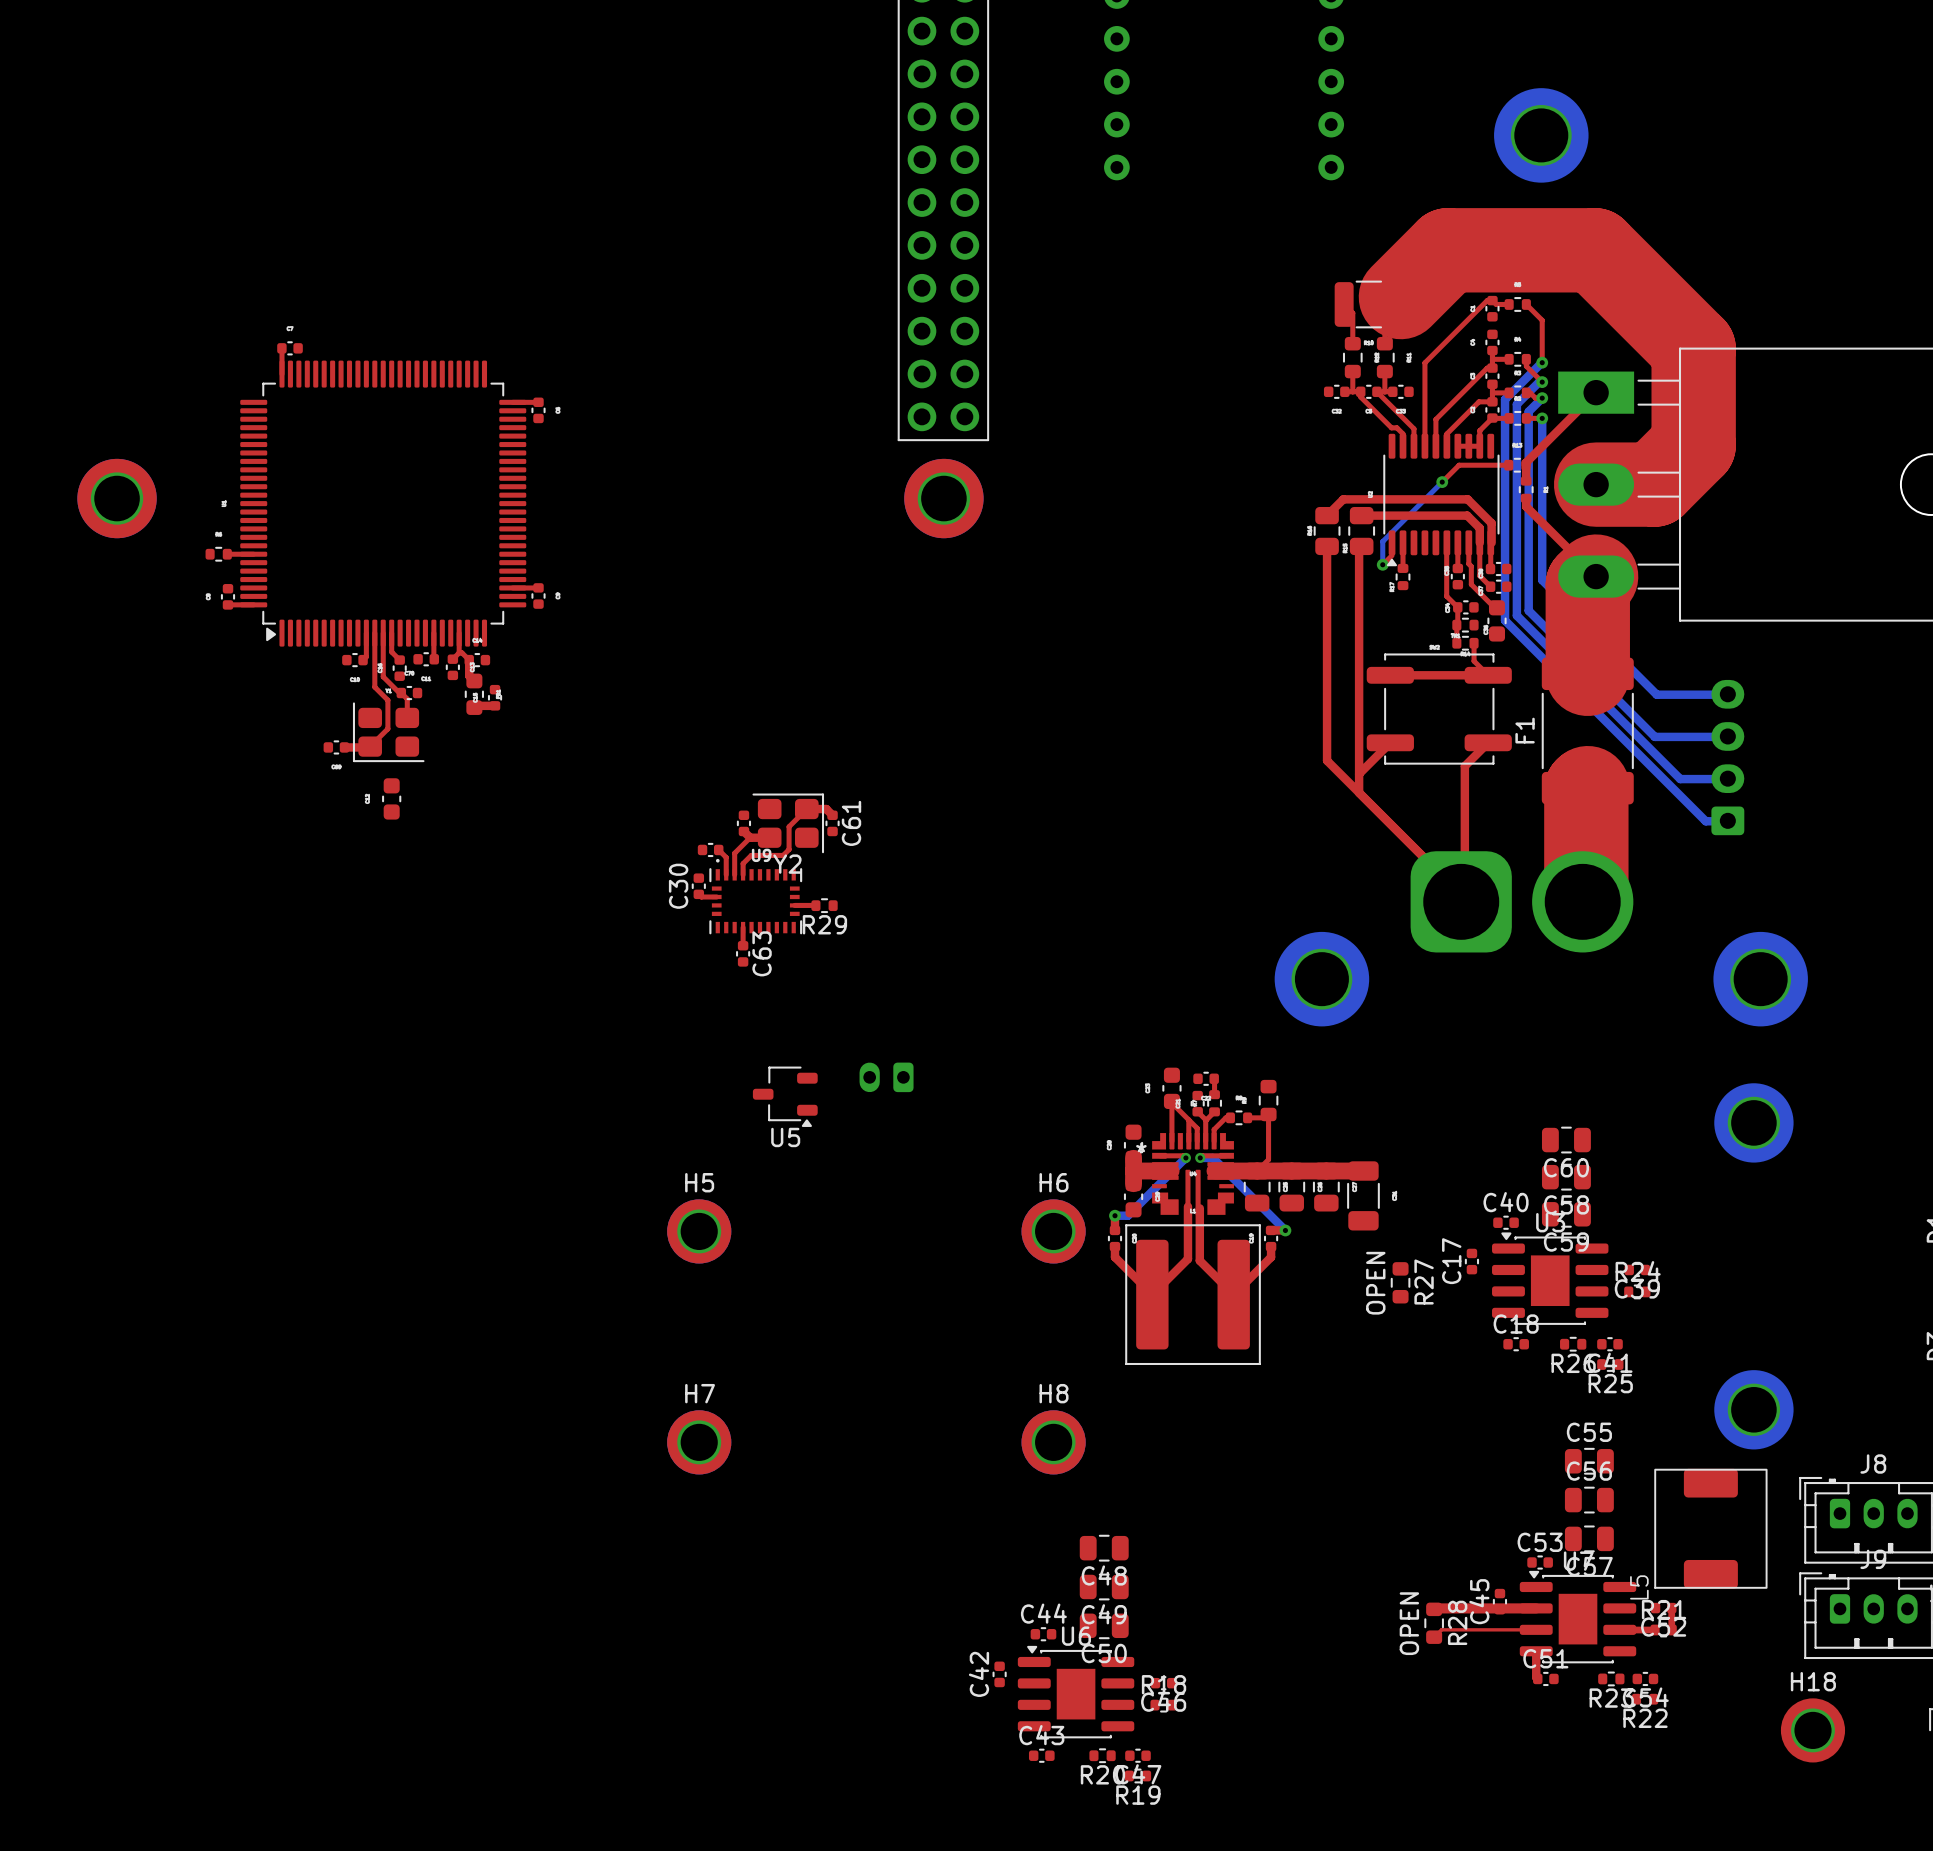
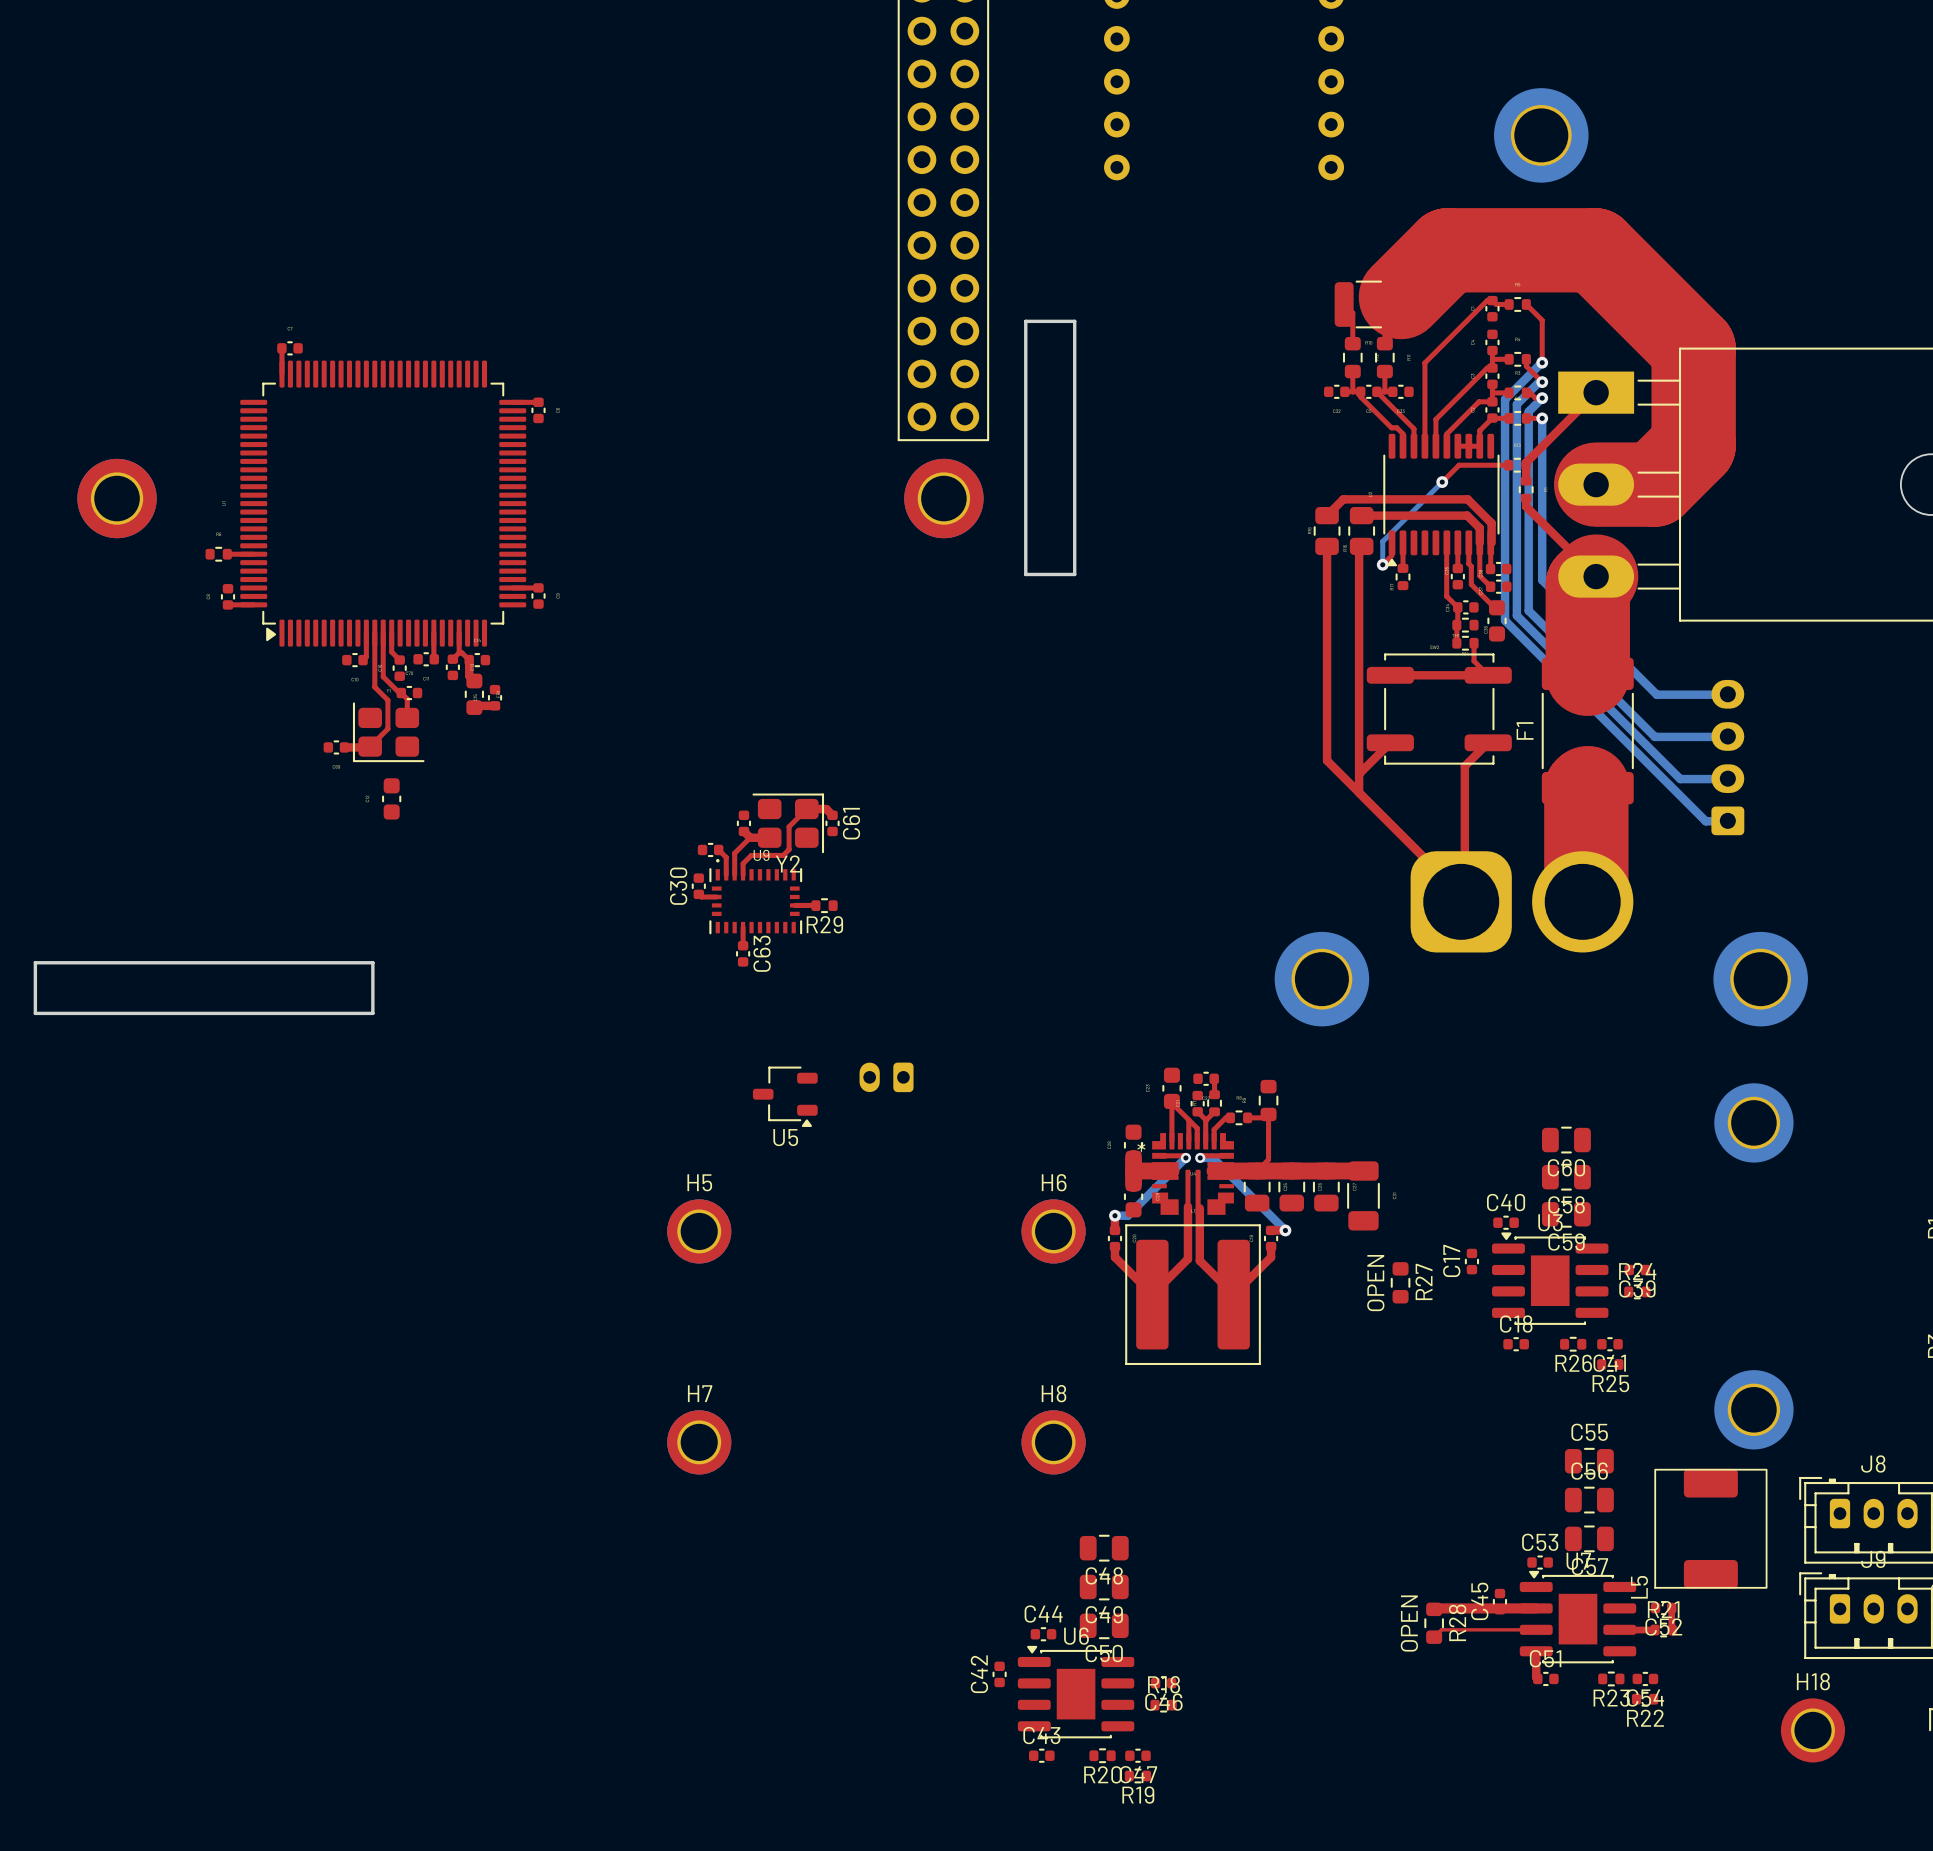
board edge: none -> (1025, 321) (1074, 321) (1074, 574) (1025, 574) (1025, 321)
board edge: none -> (35, 962) (372, 962) (372, 1013) (35, 1013) (35, 962)

